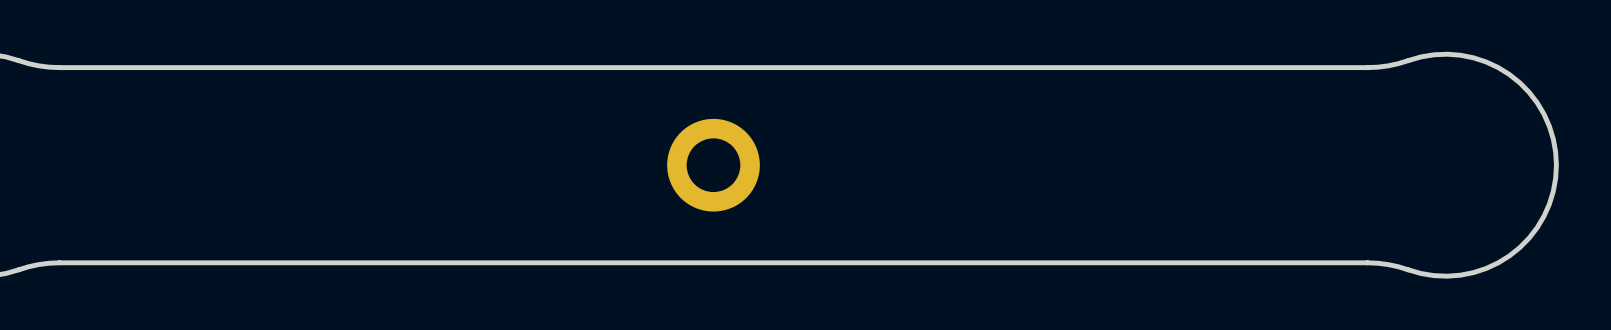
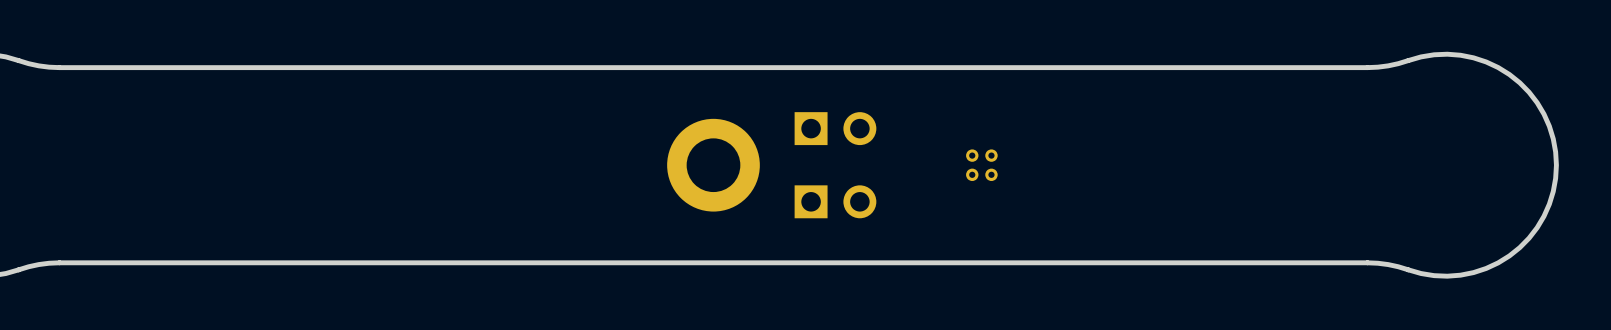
part: none -> (835, 128)
part: none -> (981, 165)
part: none -> (835, 201)

